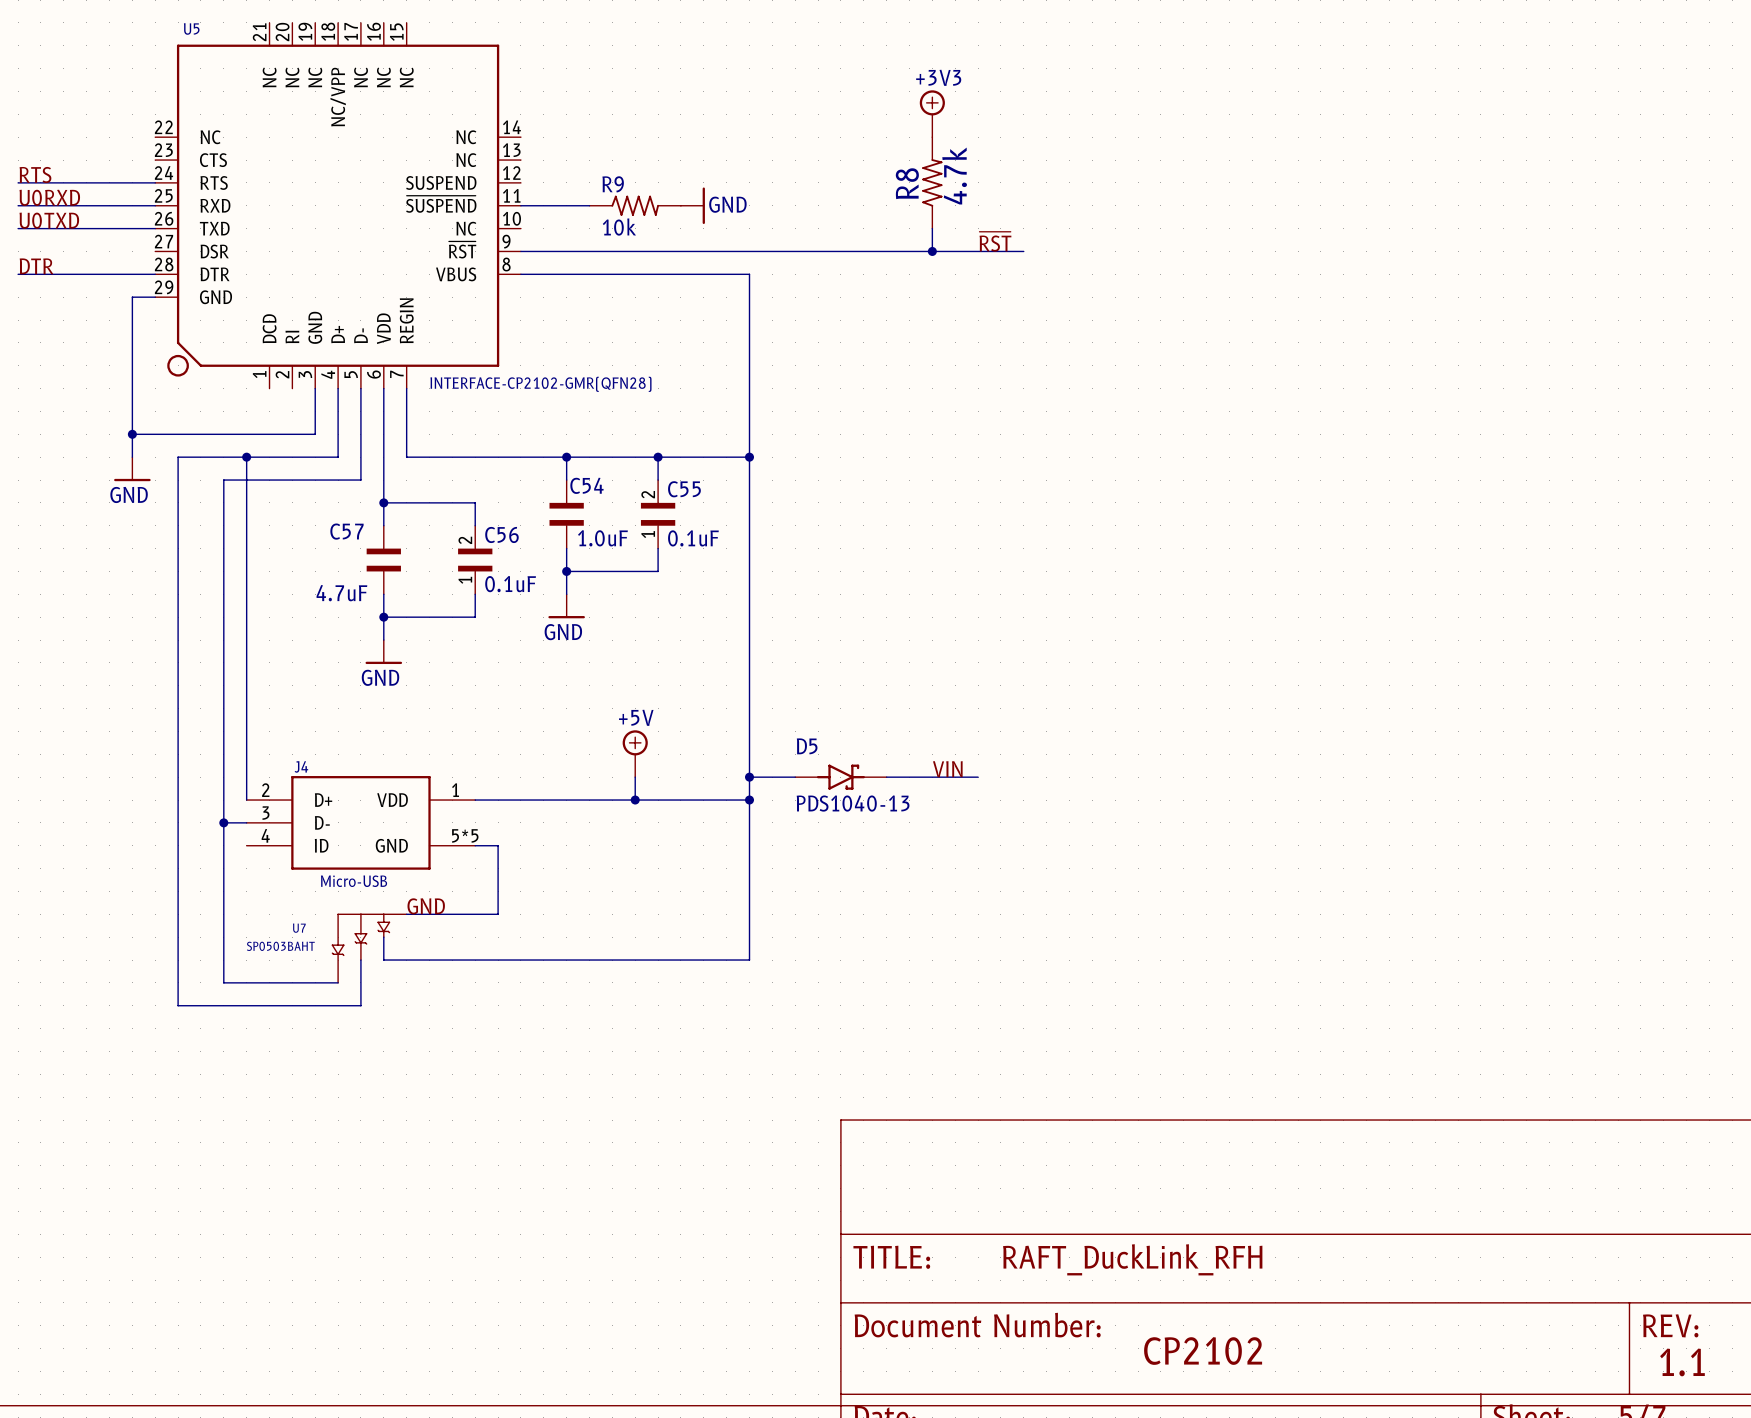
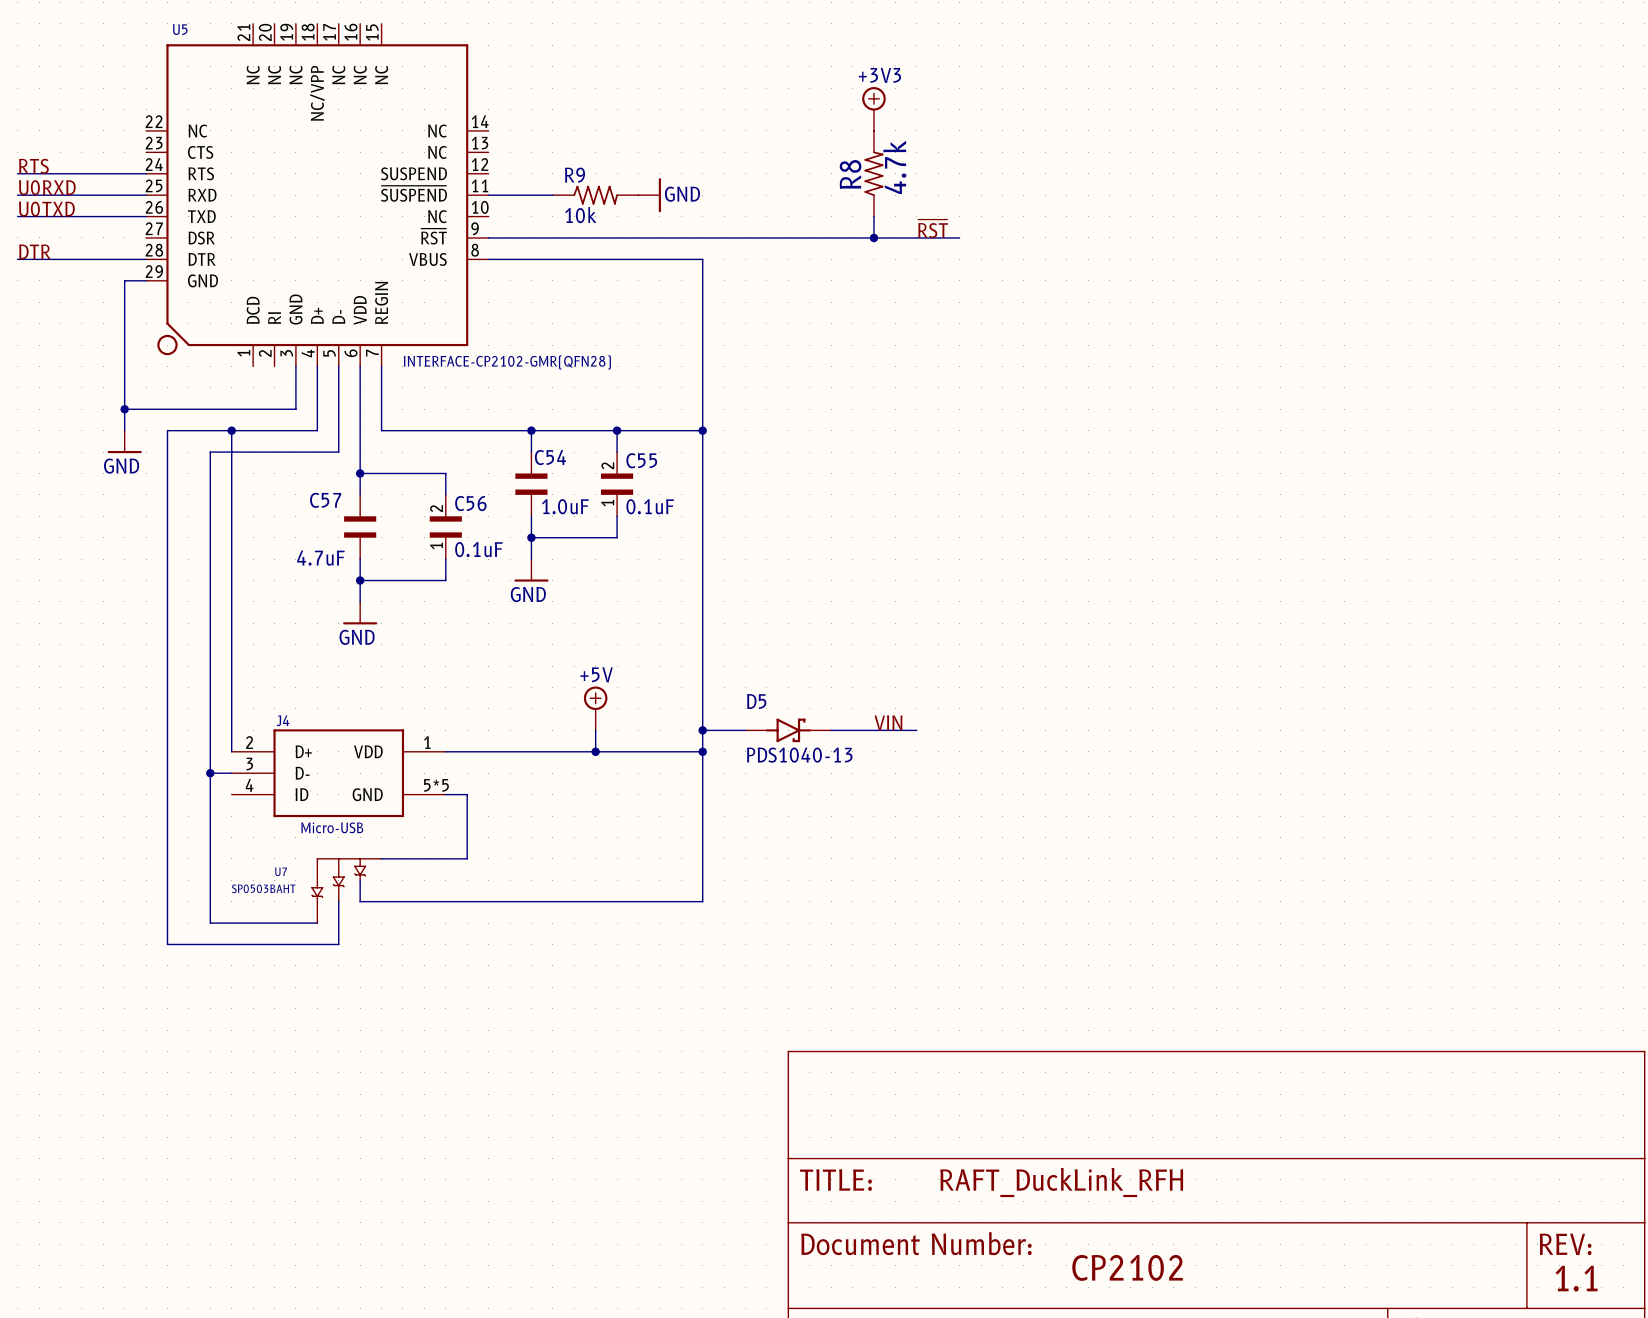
label: GND (426, 906) -> none

